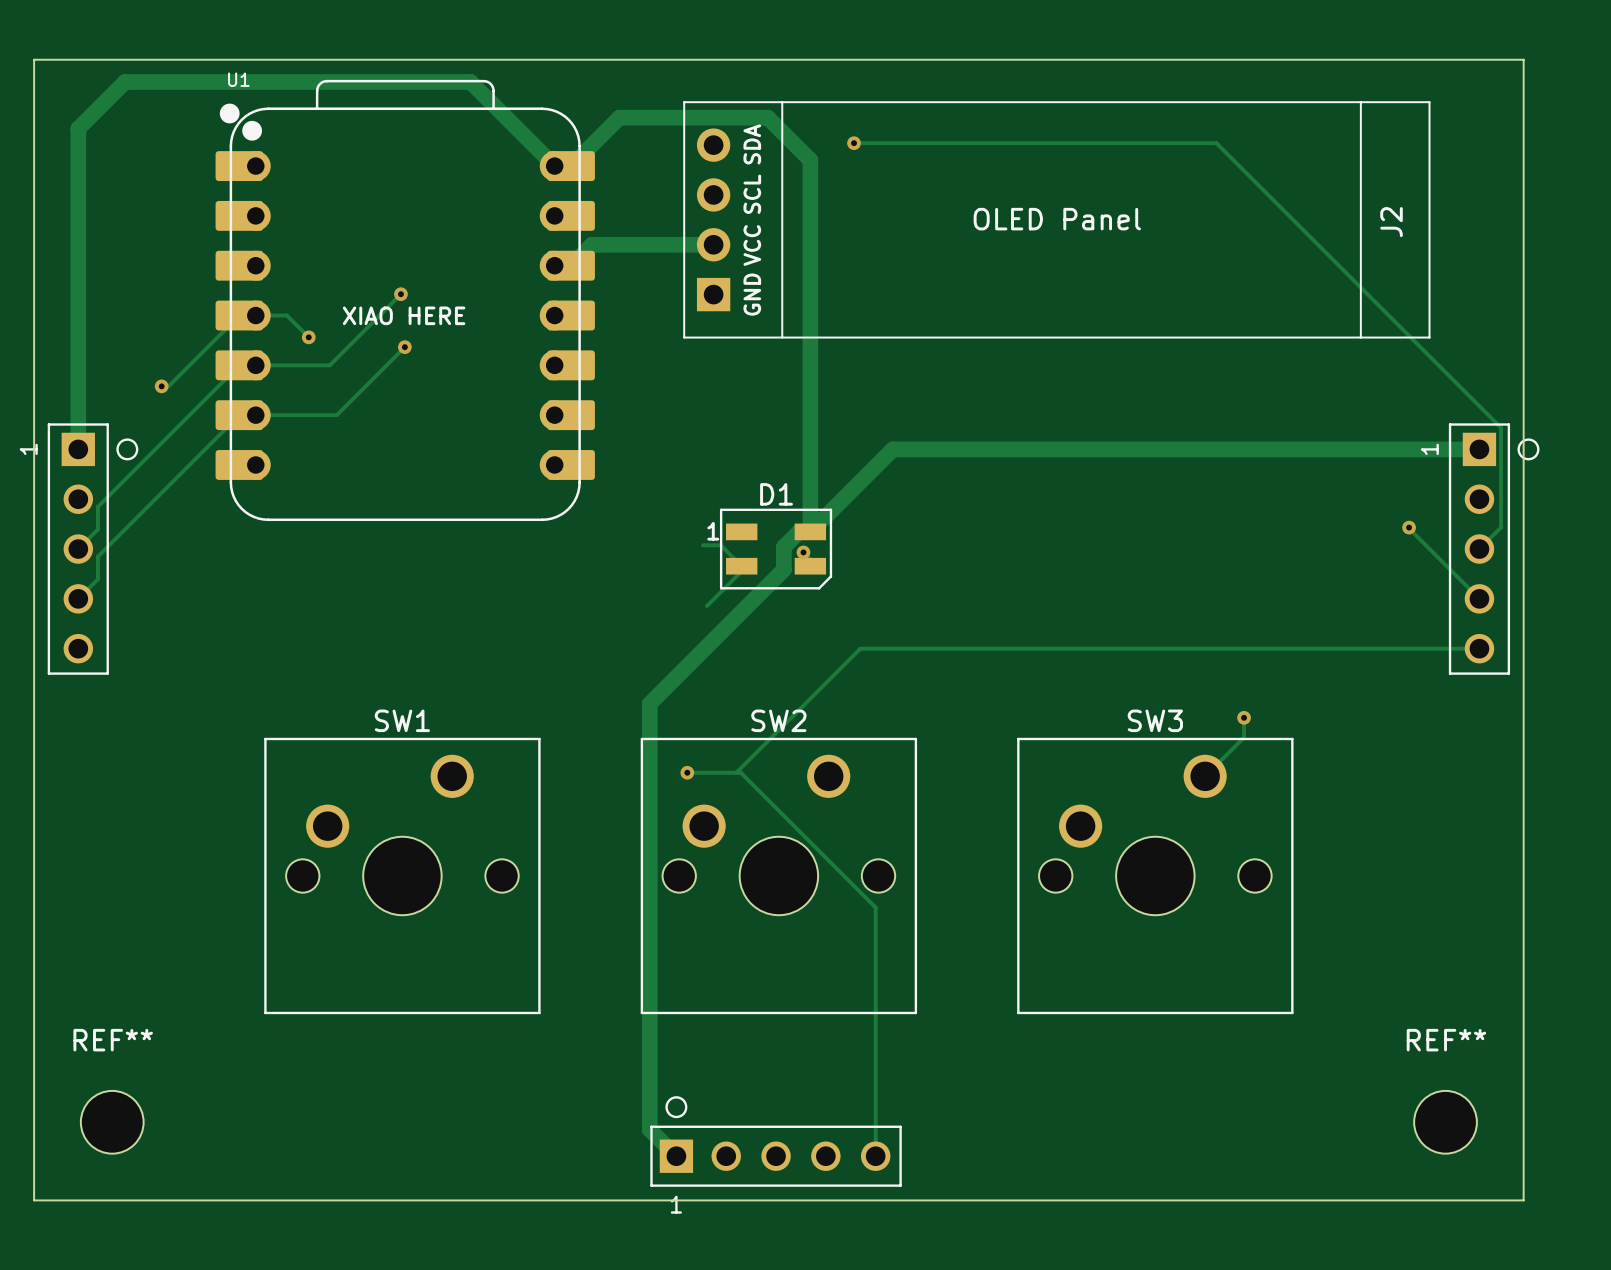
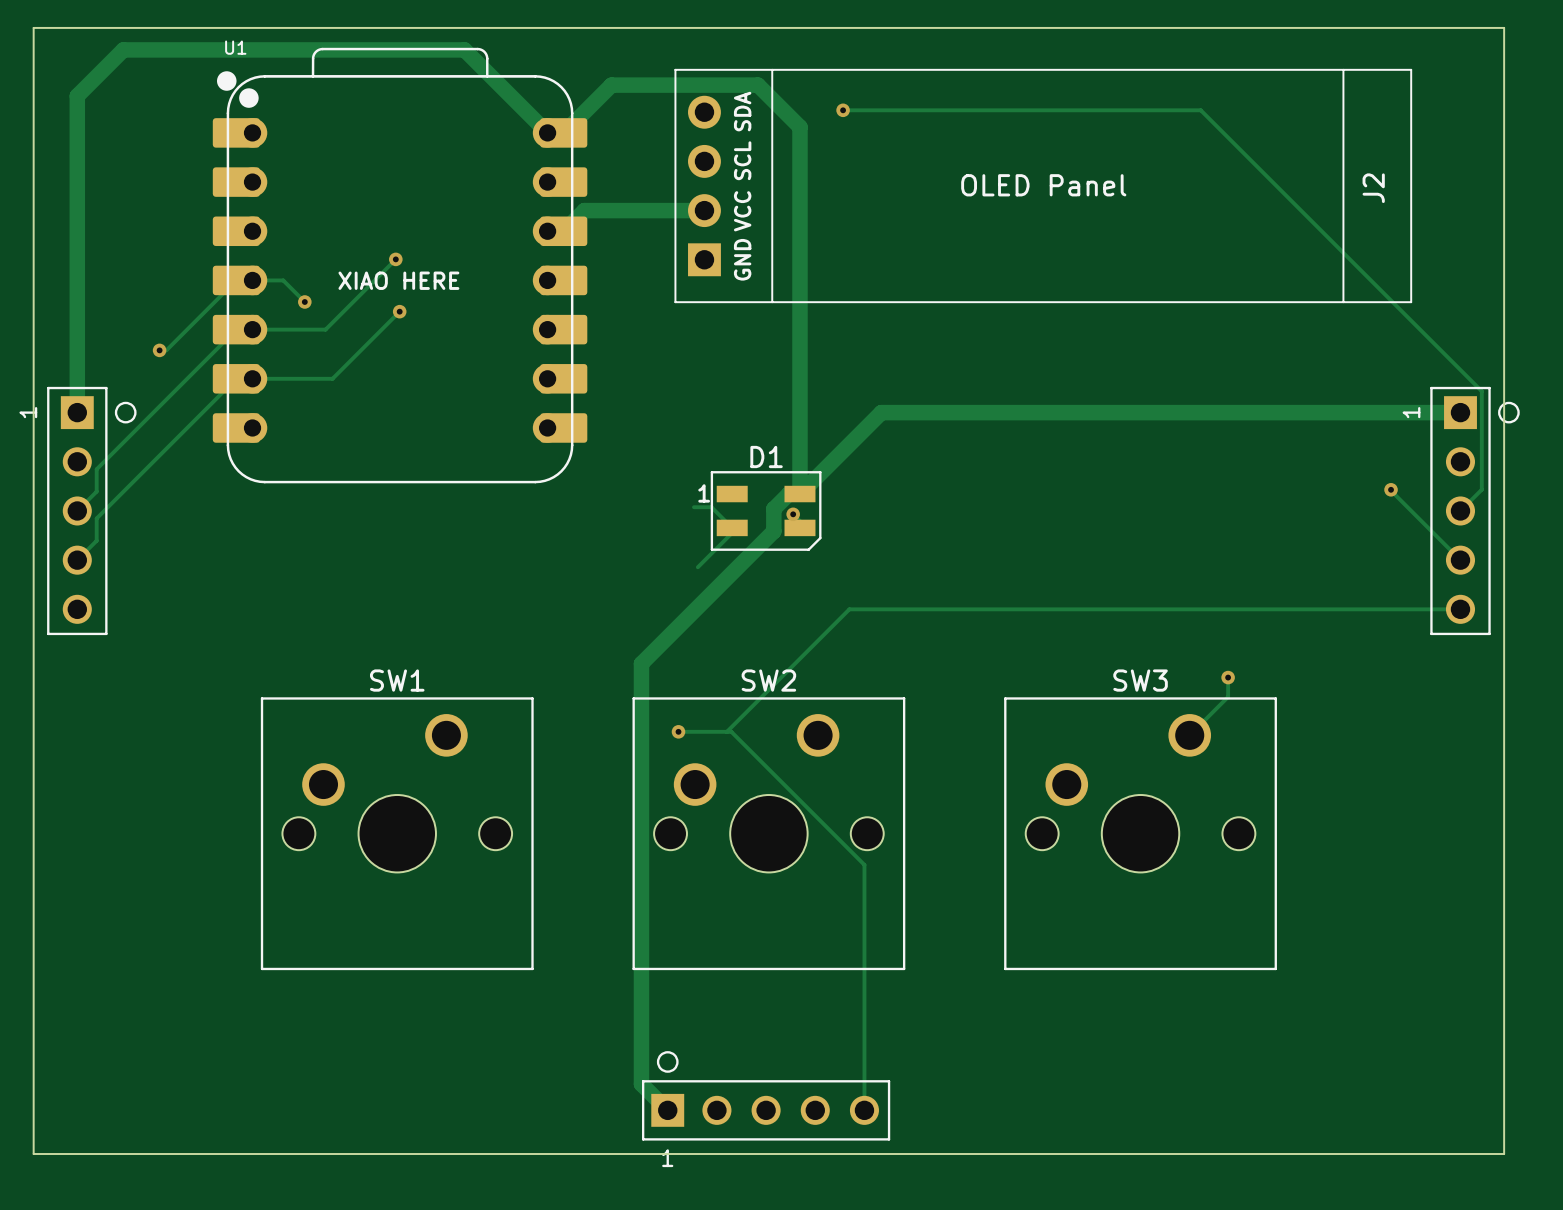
REF**: (112, 1122) -> none
REF**: (1445, 1122) -> none

